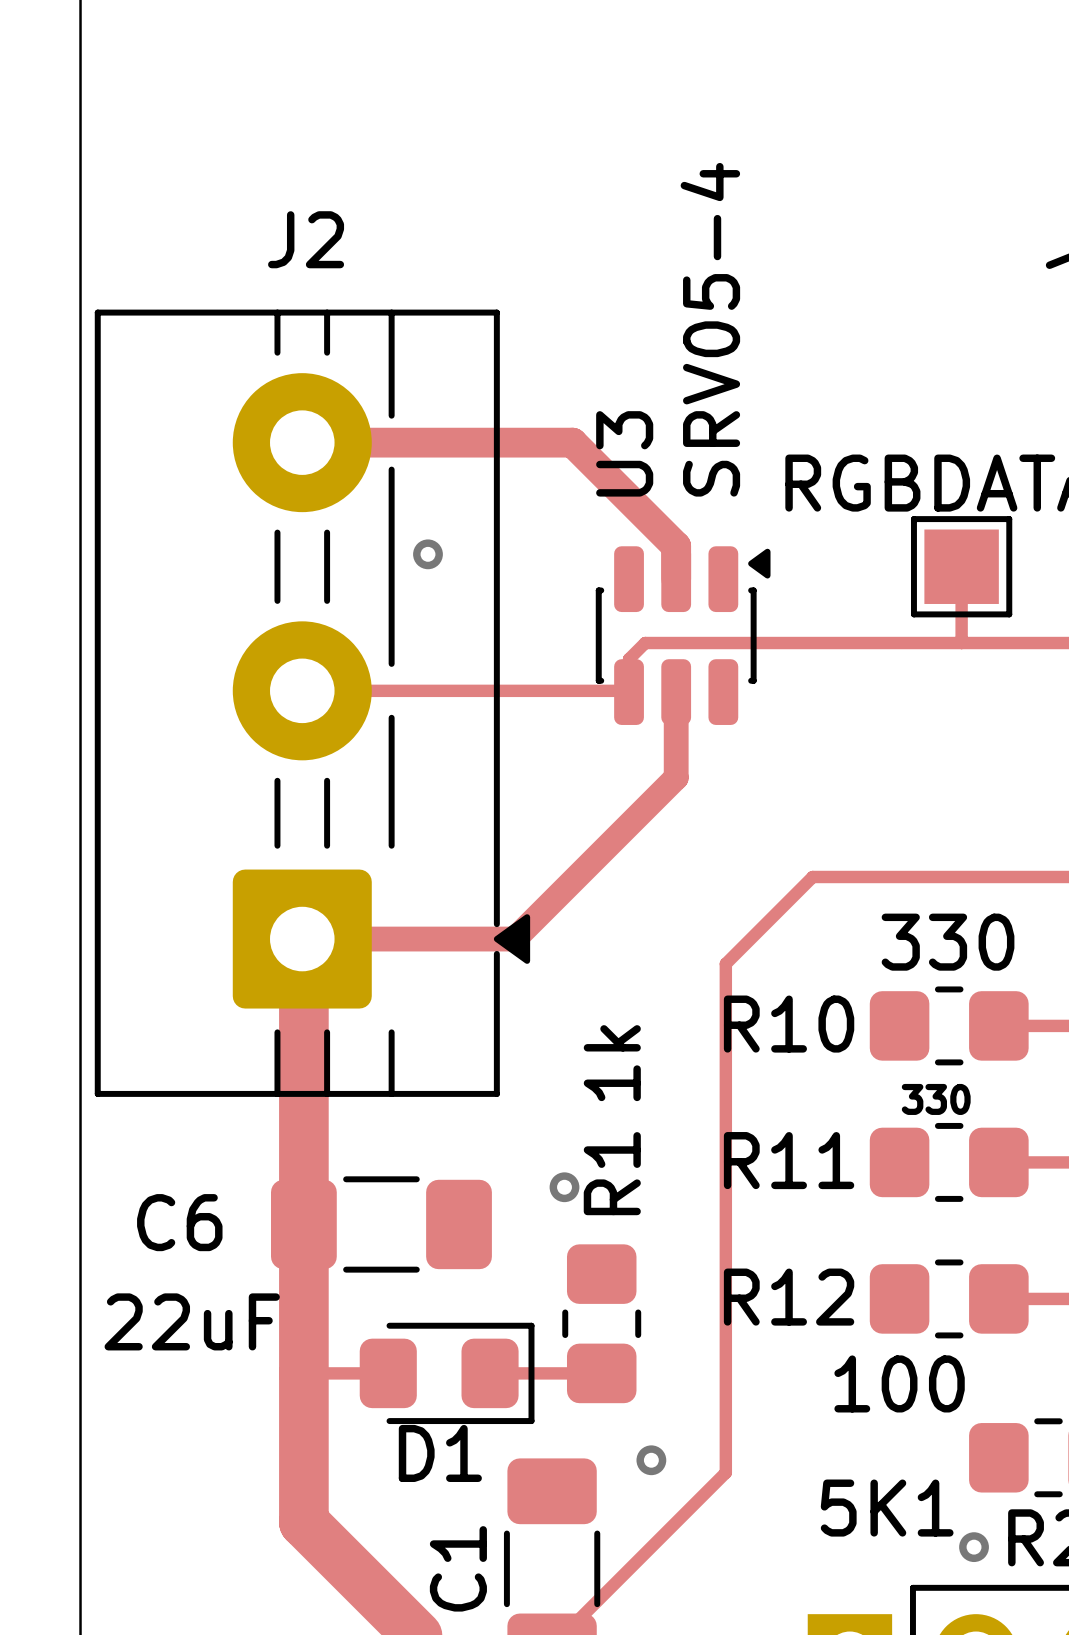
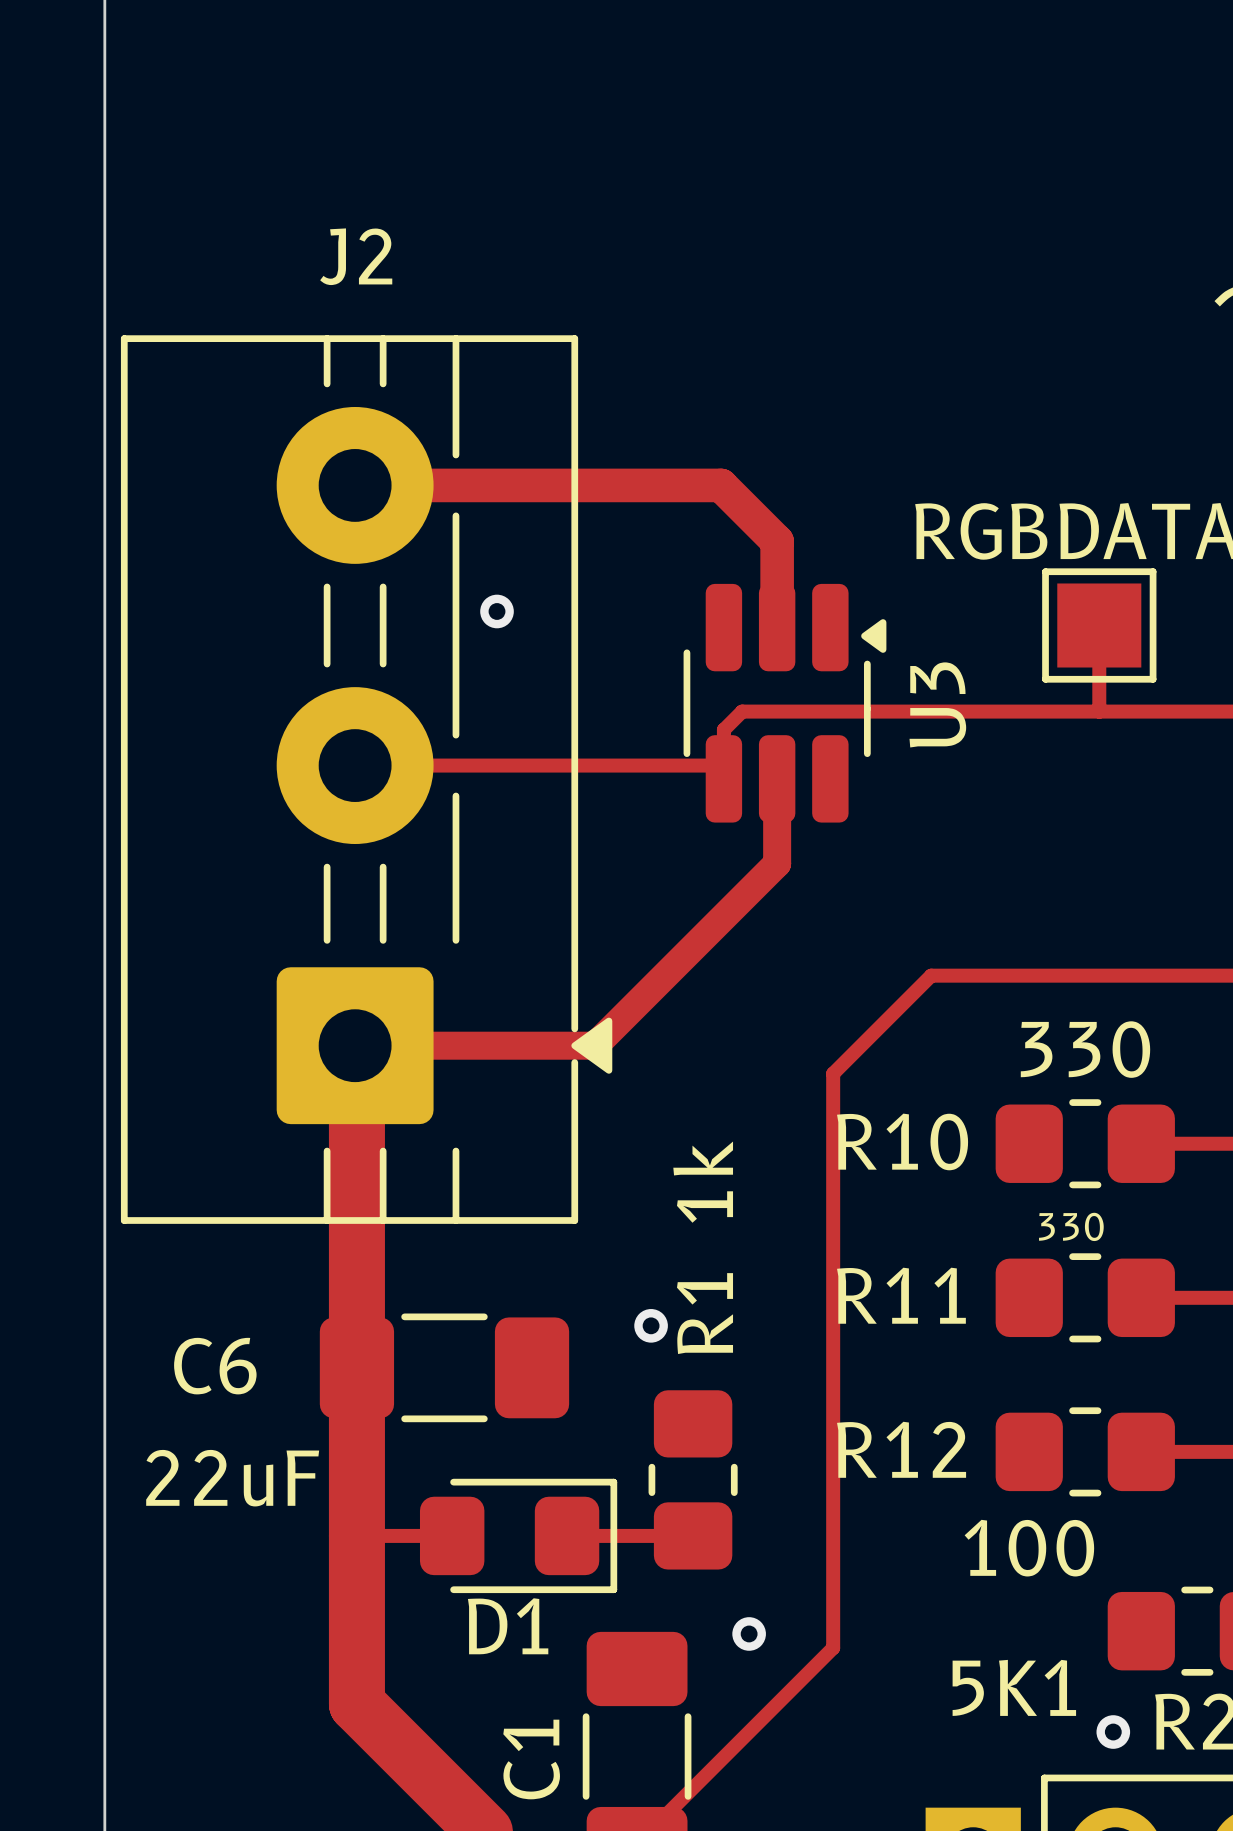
U3 value: SRV05-4 (710, 329) -> none
track: (572, 442) (676, 546) -> (660, 485) (721, 485) (777, 541) (777, 602)
U3 name position: U3 (624, 453) -> U3 (937, 704)
U3 footprint: [595, 546, 771, 725] -> [683, 583, 887, 823]

